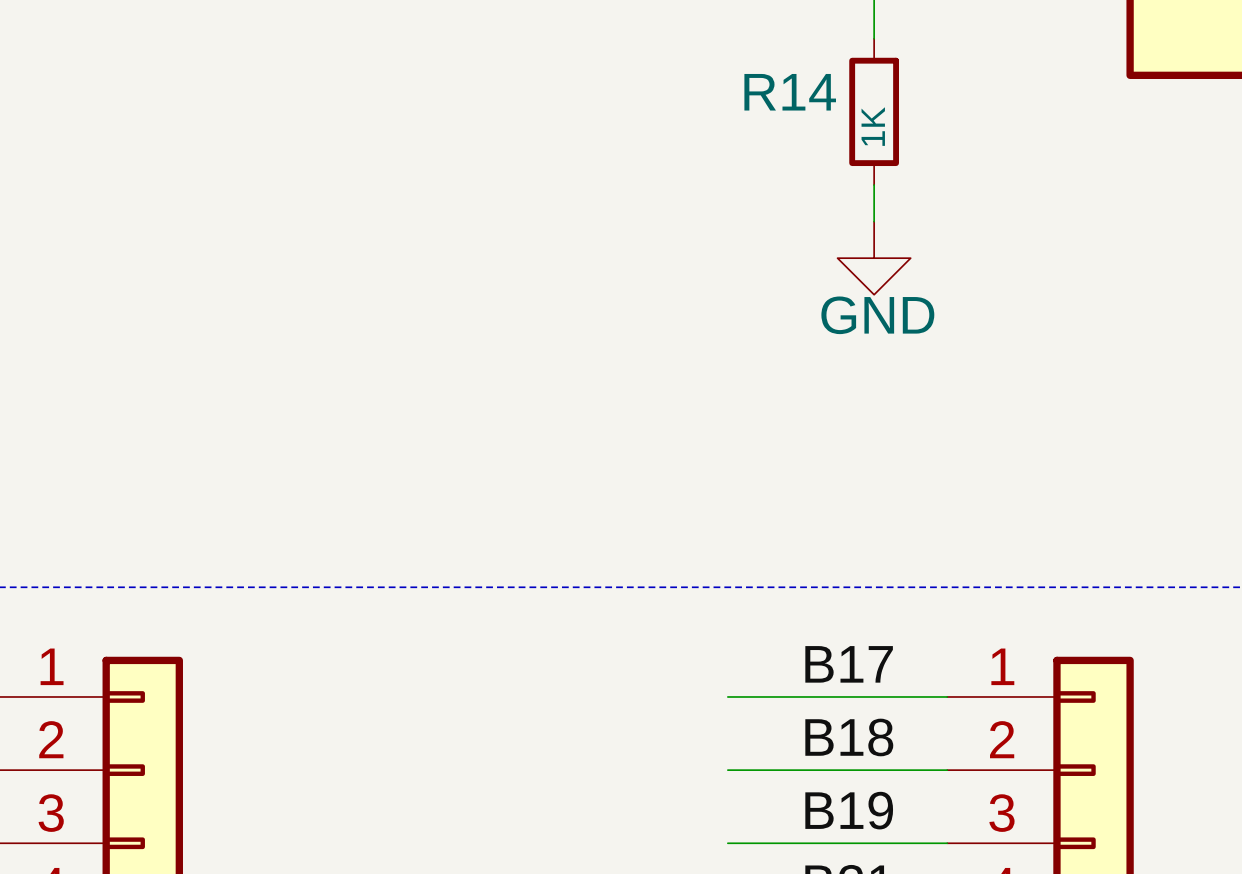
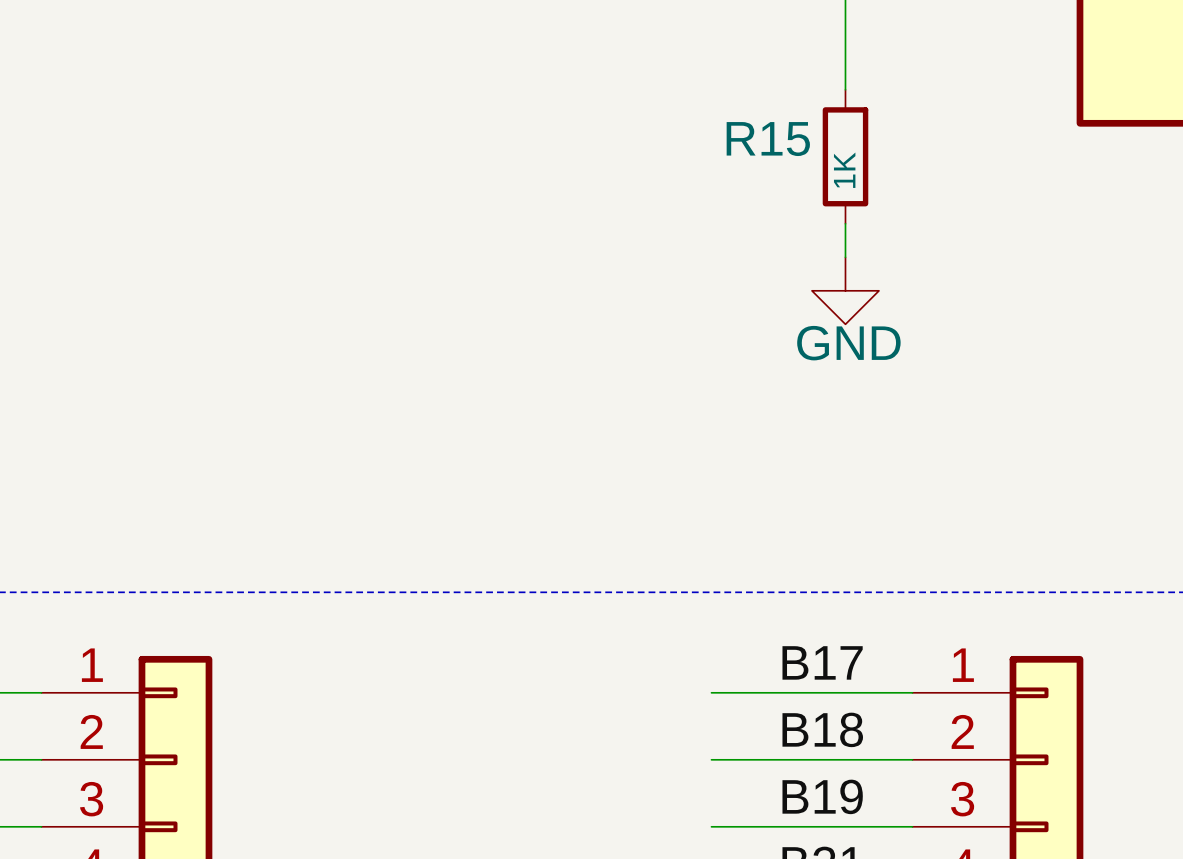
R14 name: R14 (790, 92) -> R15 (768, 139)

